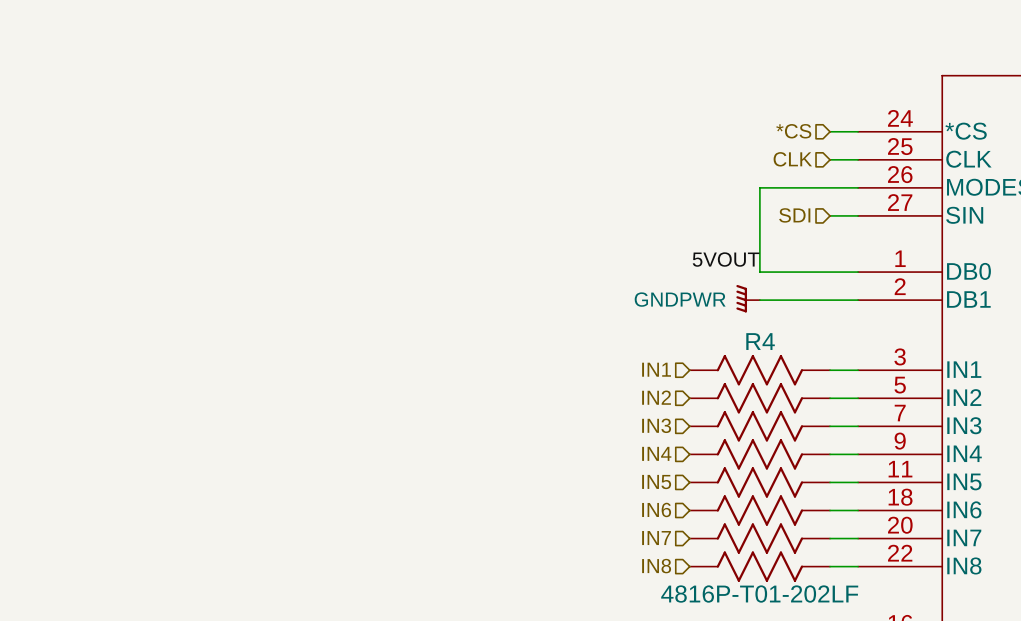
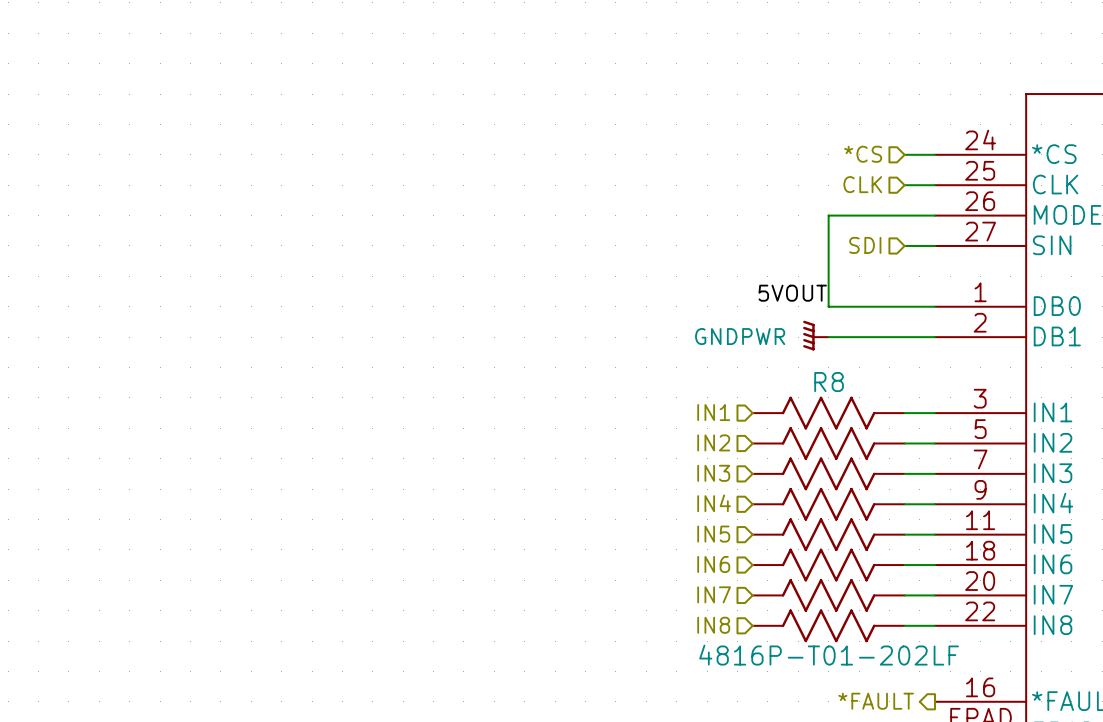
R4 name: R4 (760, 341) -> R8 (829, 382)

